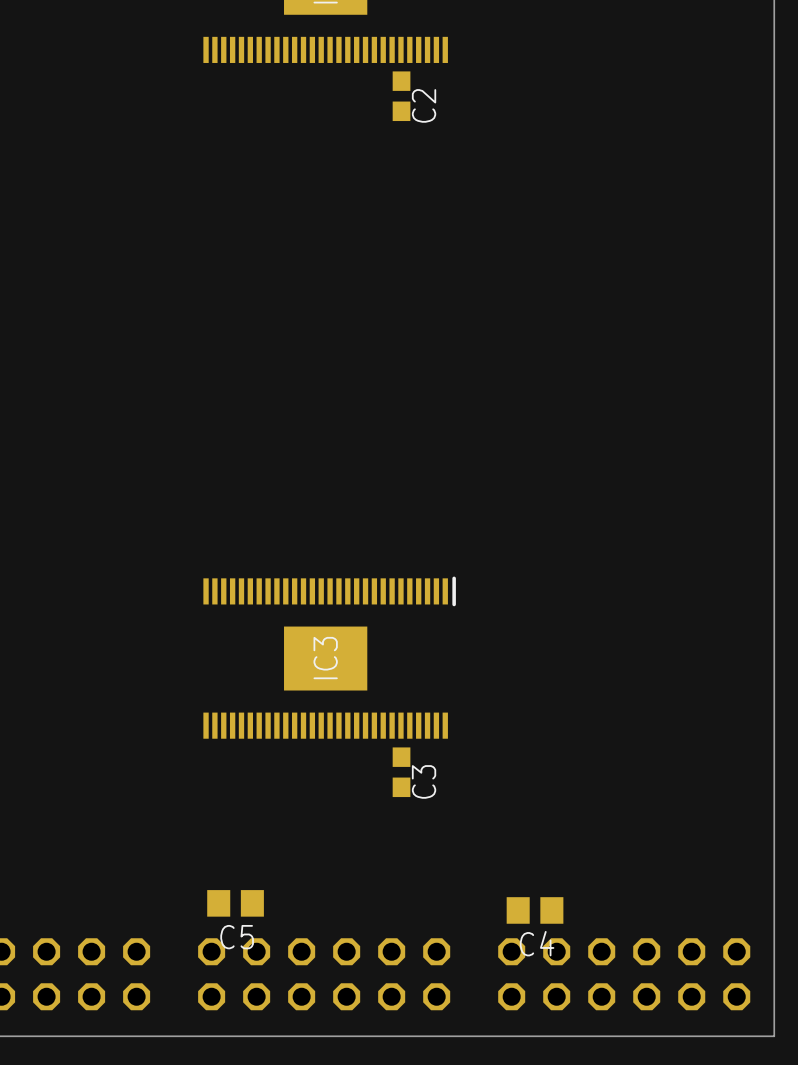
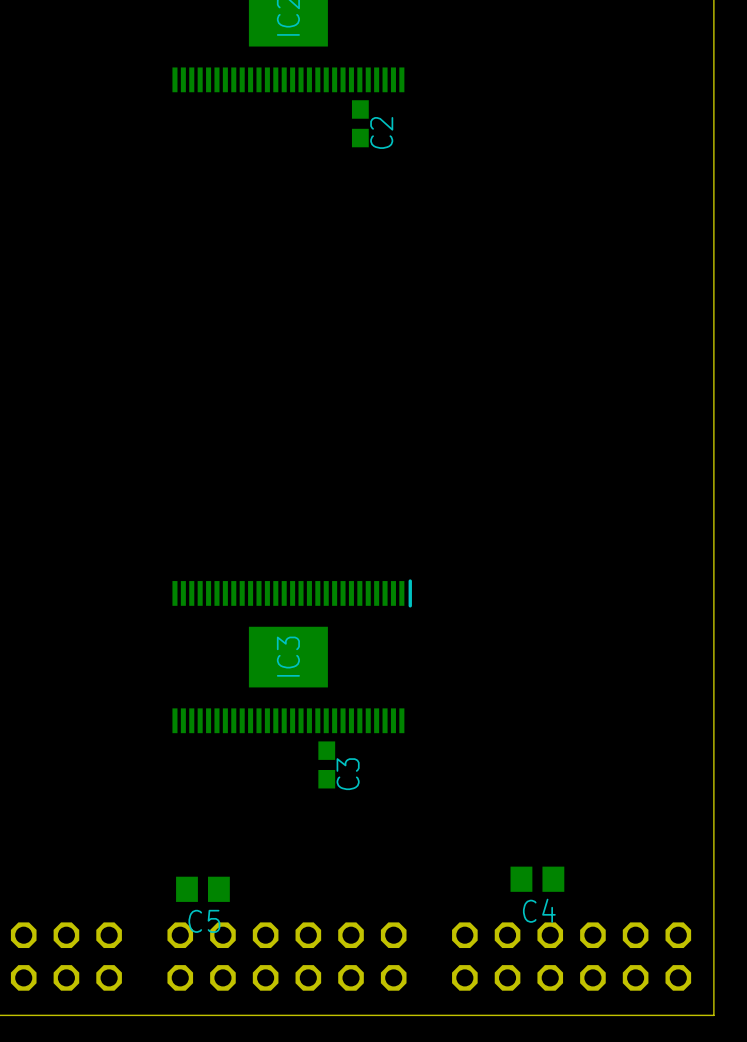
C3 position: (401, 772) -> (326, 764)
C4 position: (535, 910) -> (537, 879)

